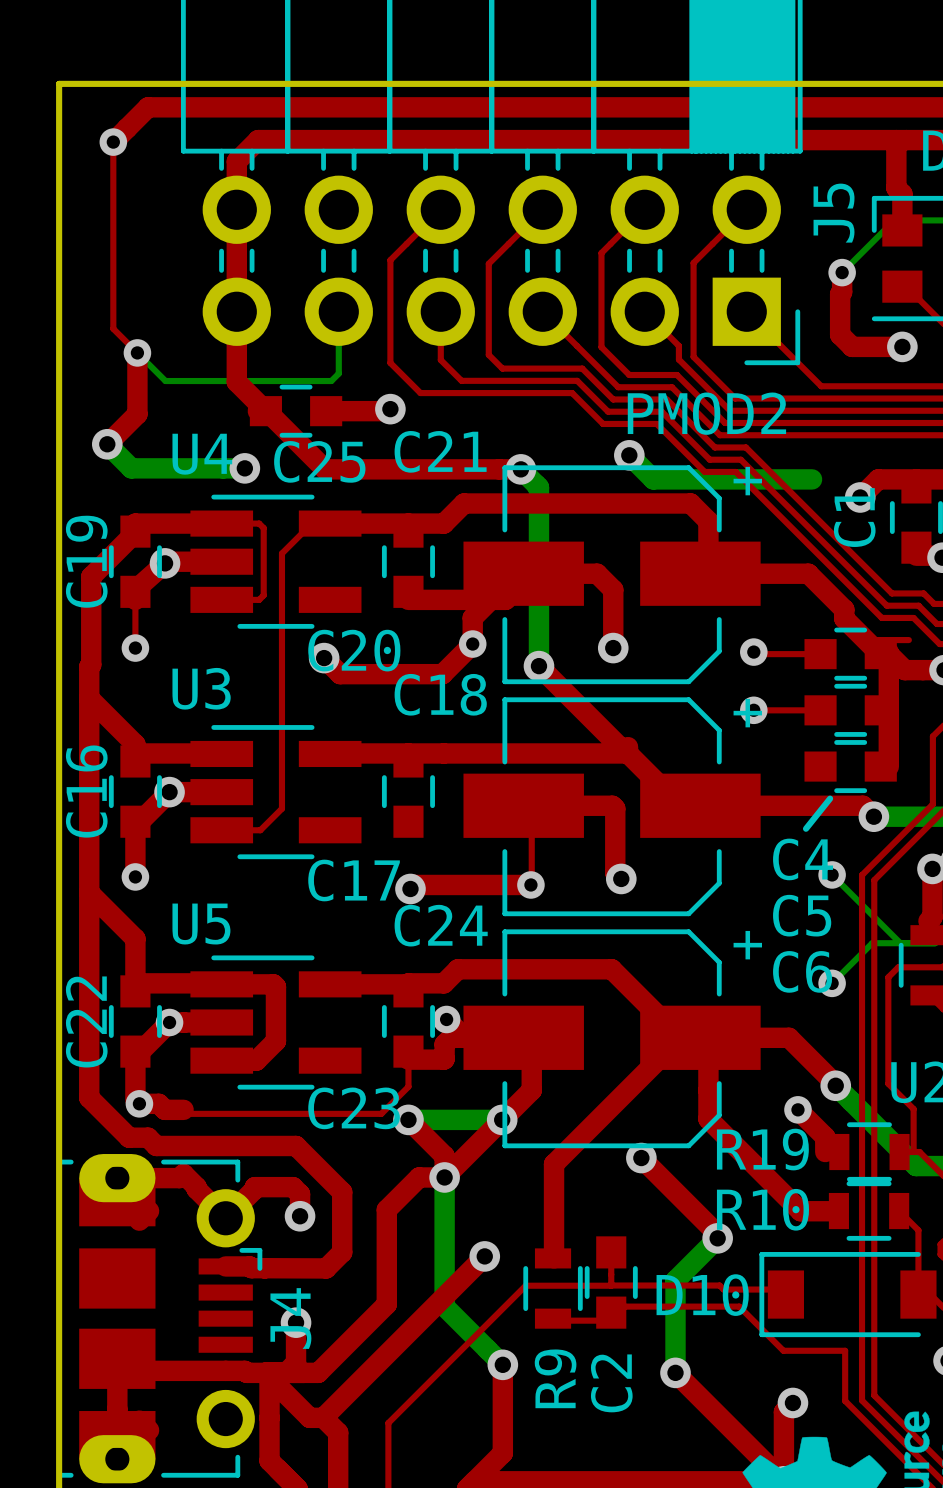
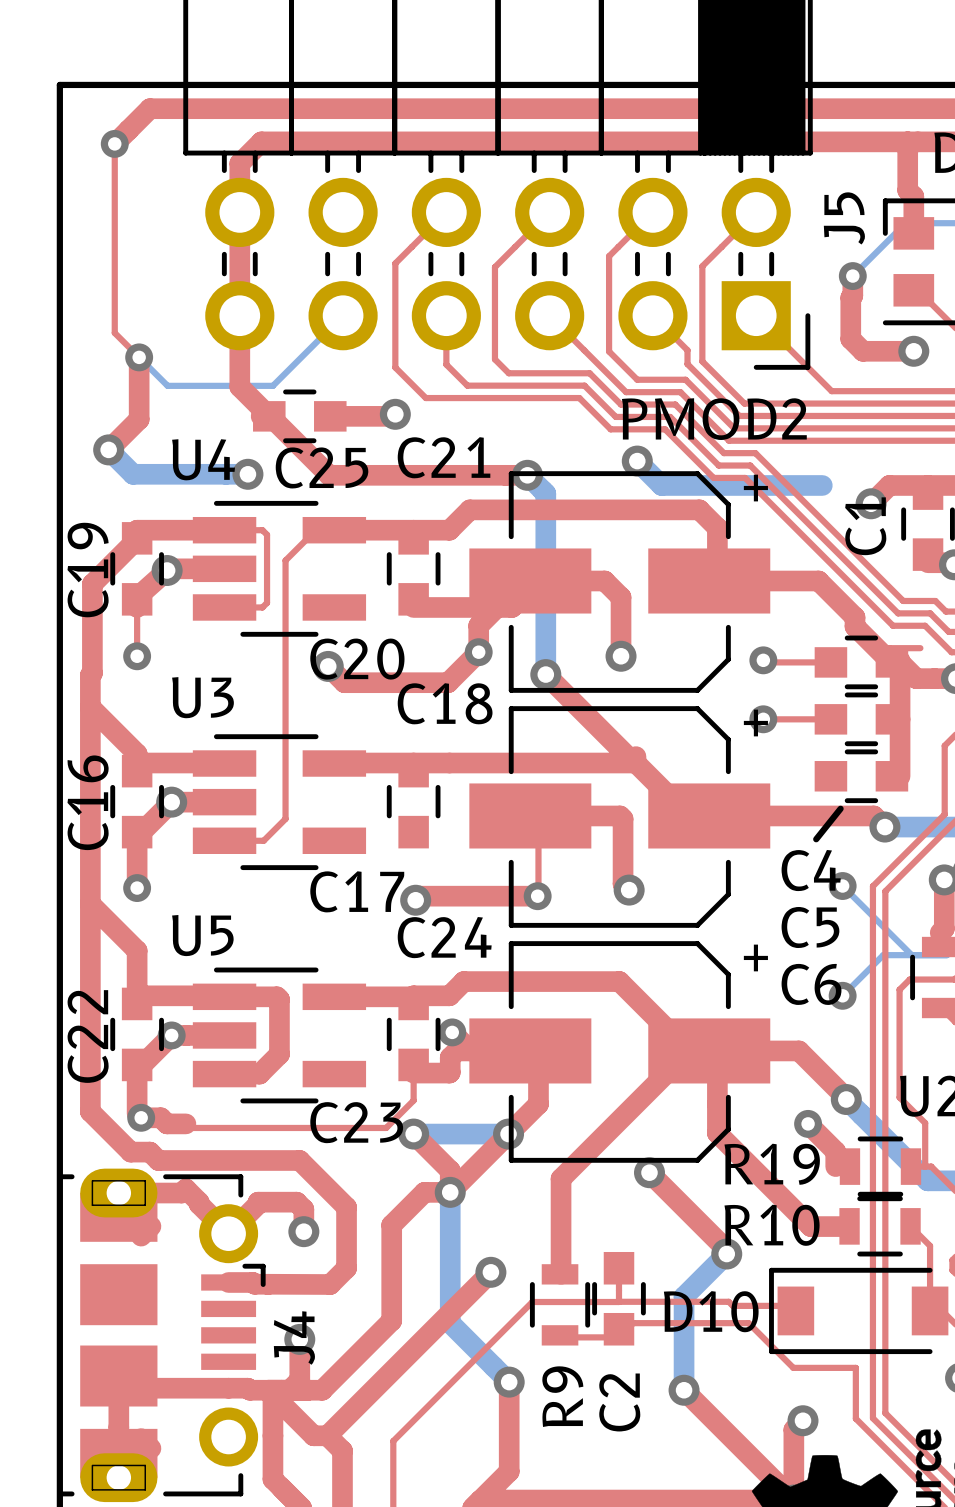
bottom track: (338, 311) (338, 373) (331, 381) (269, 381) -> (343, 315) (272, 385)

